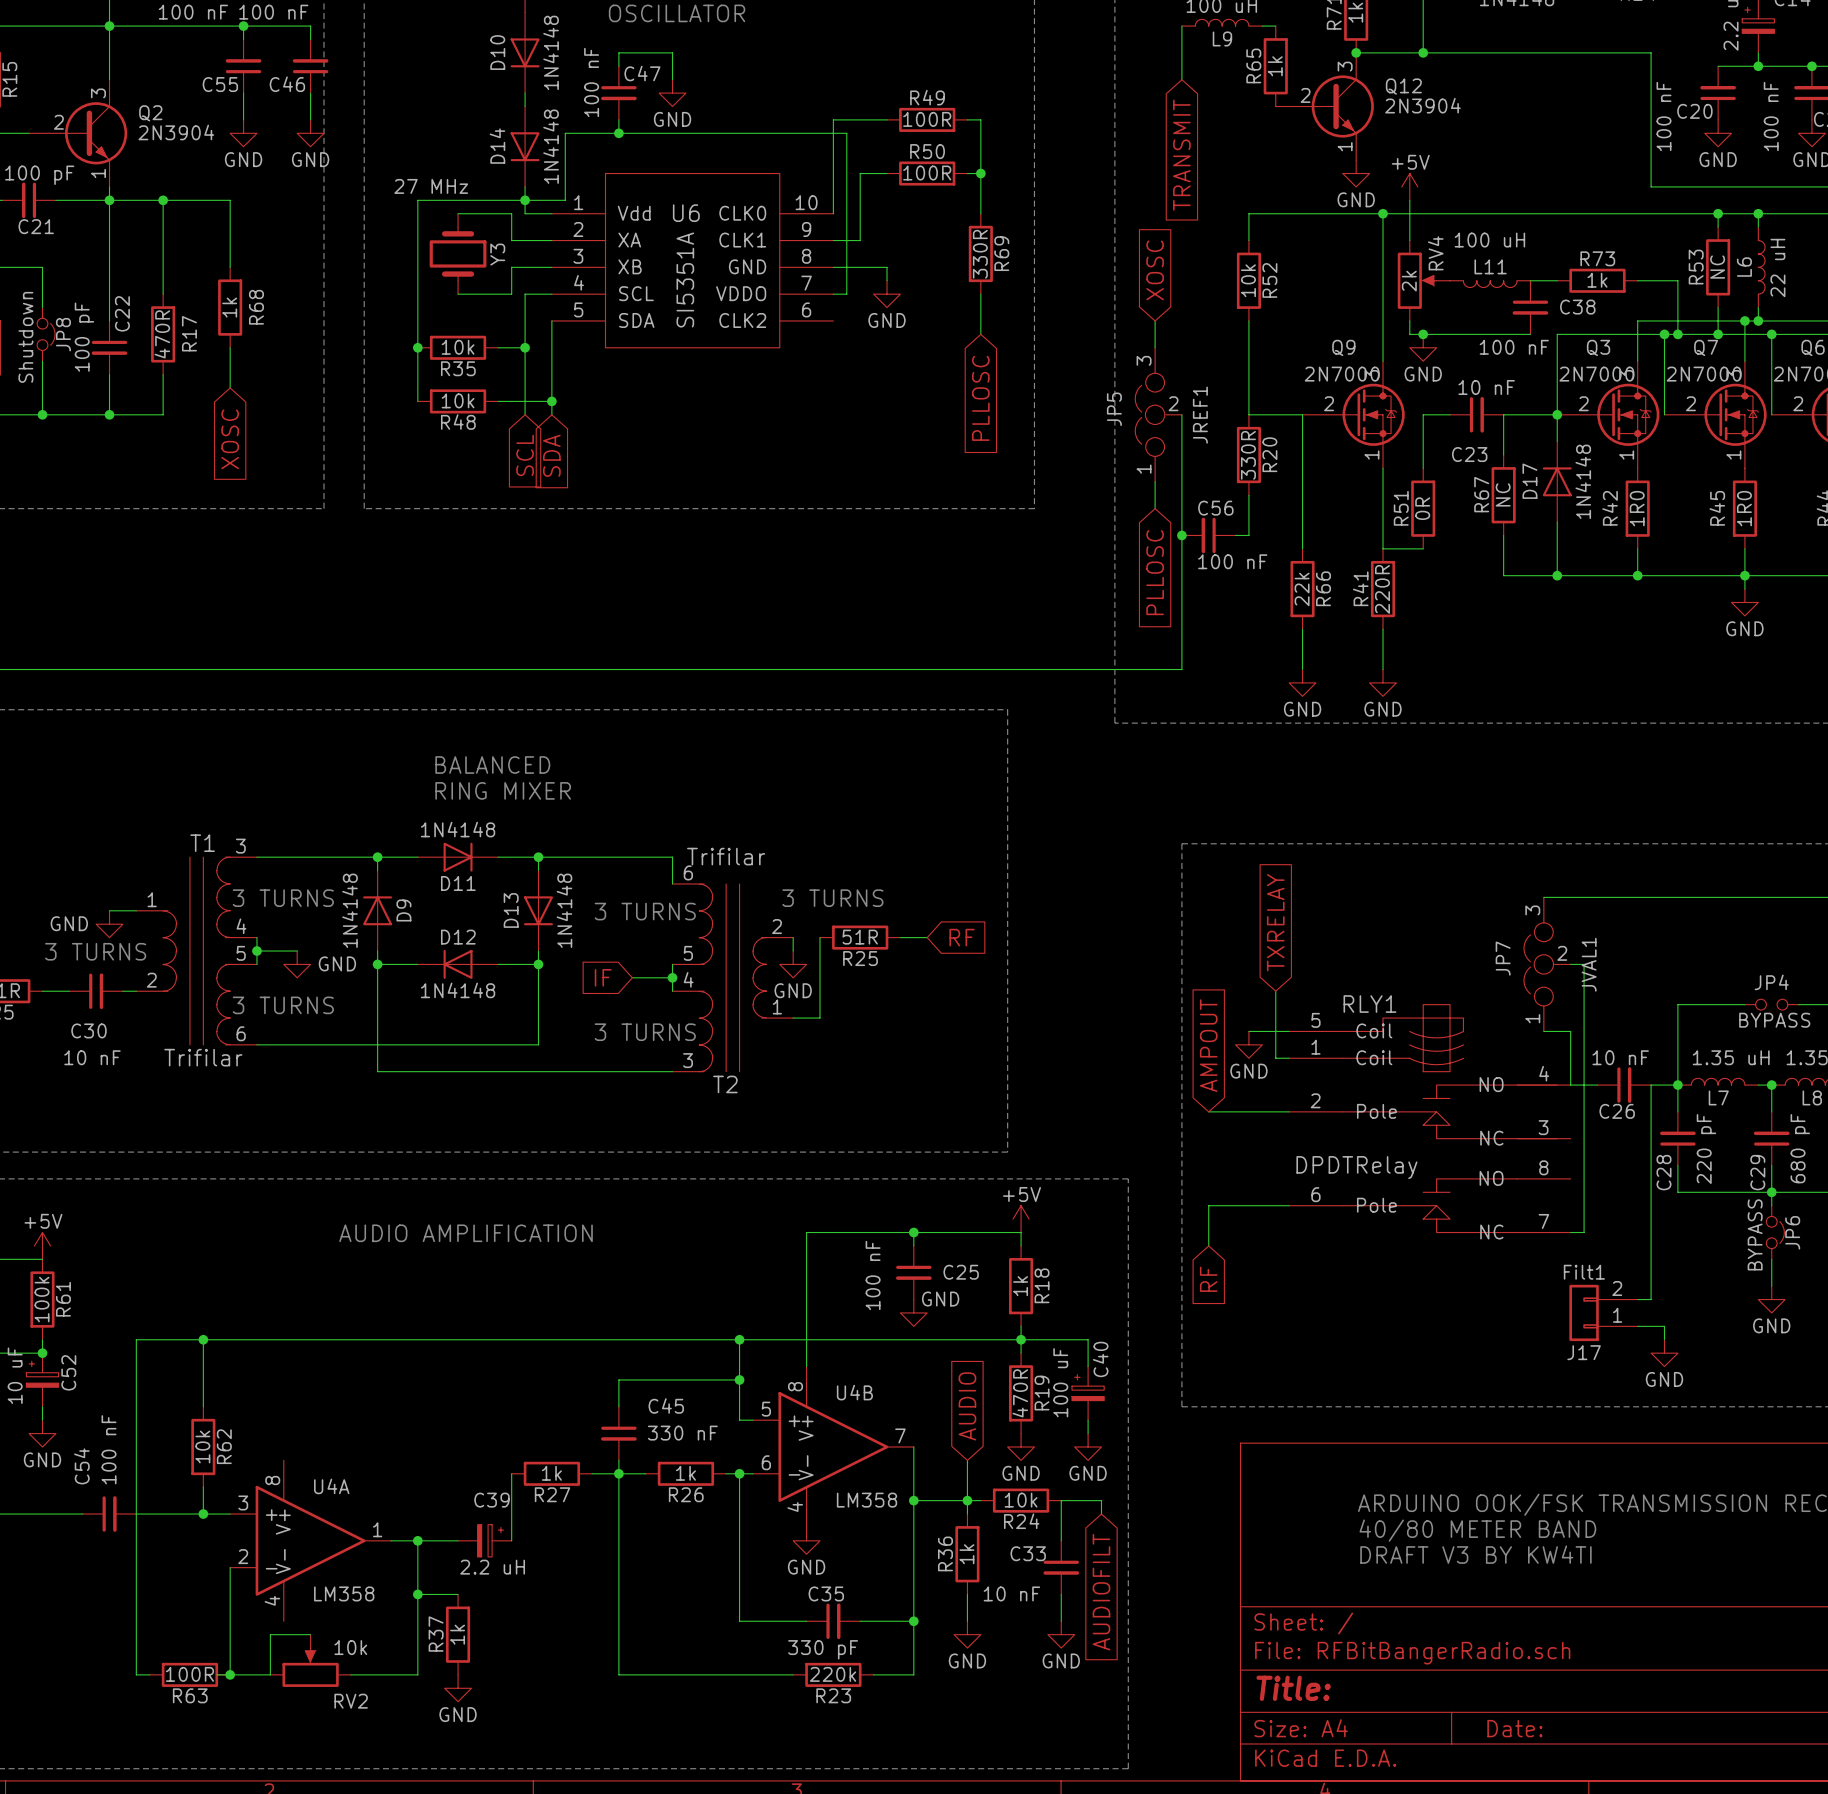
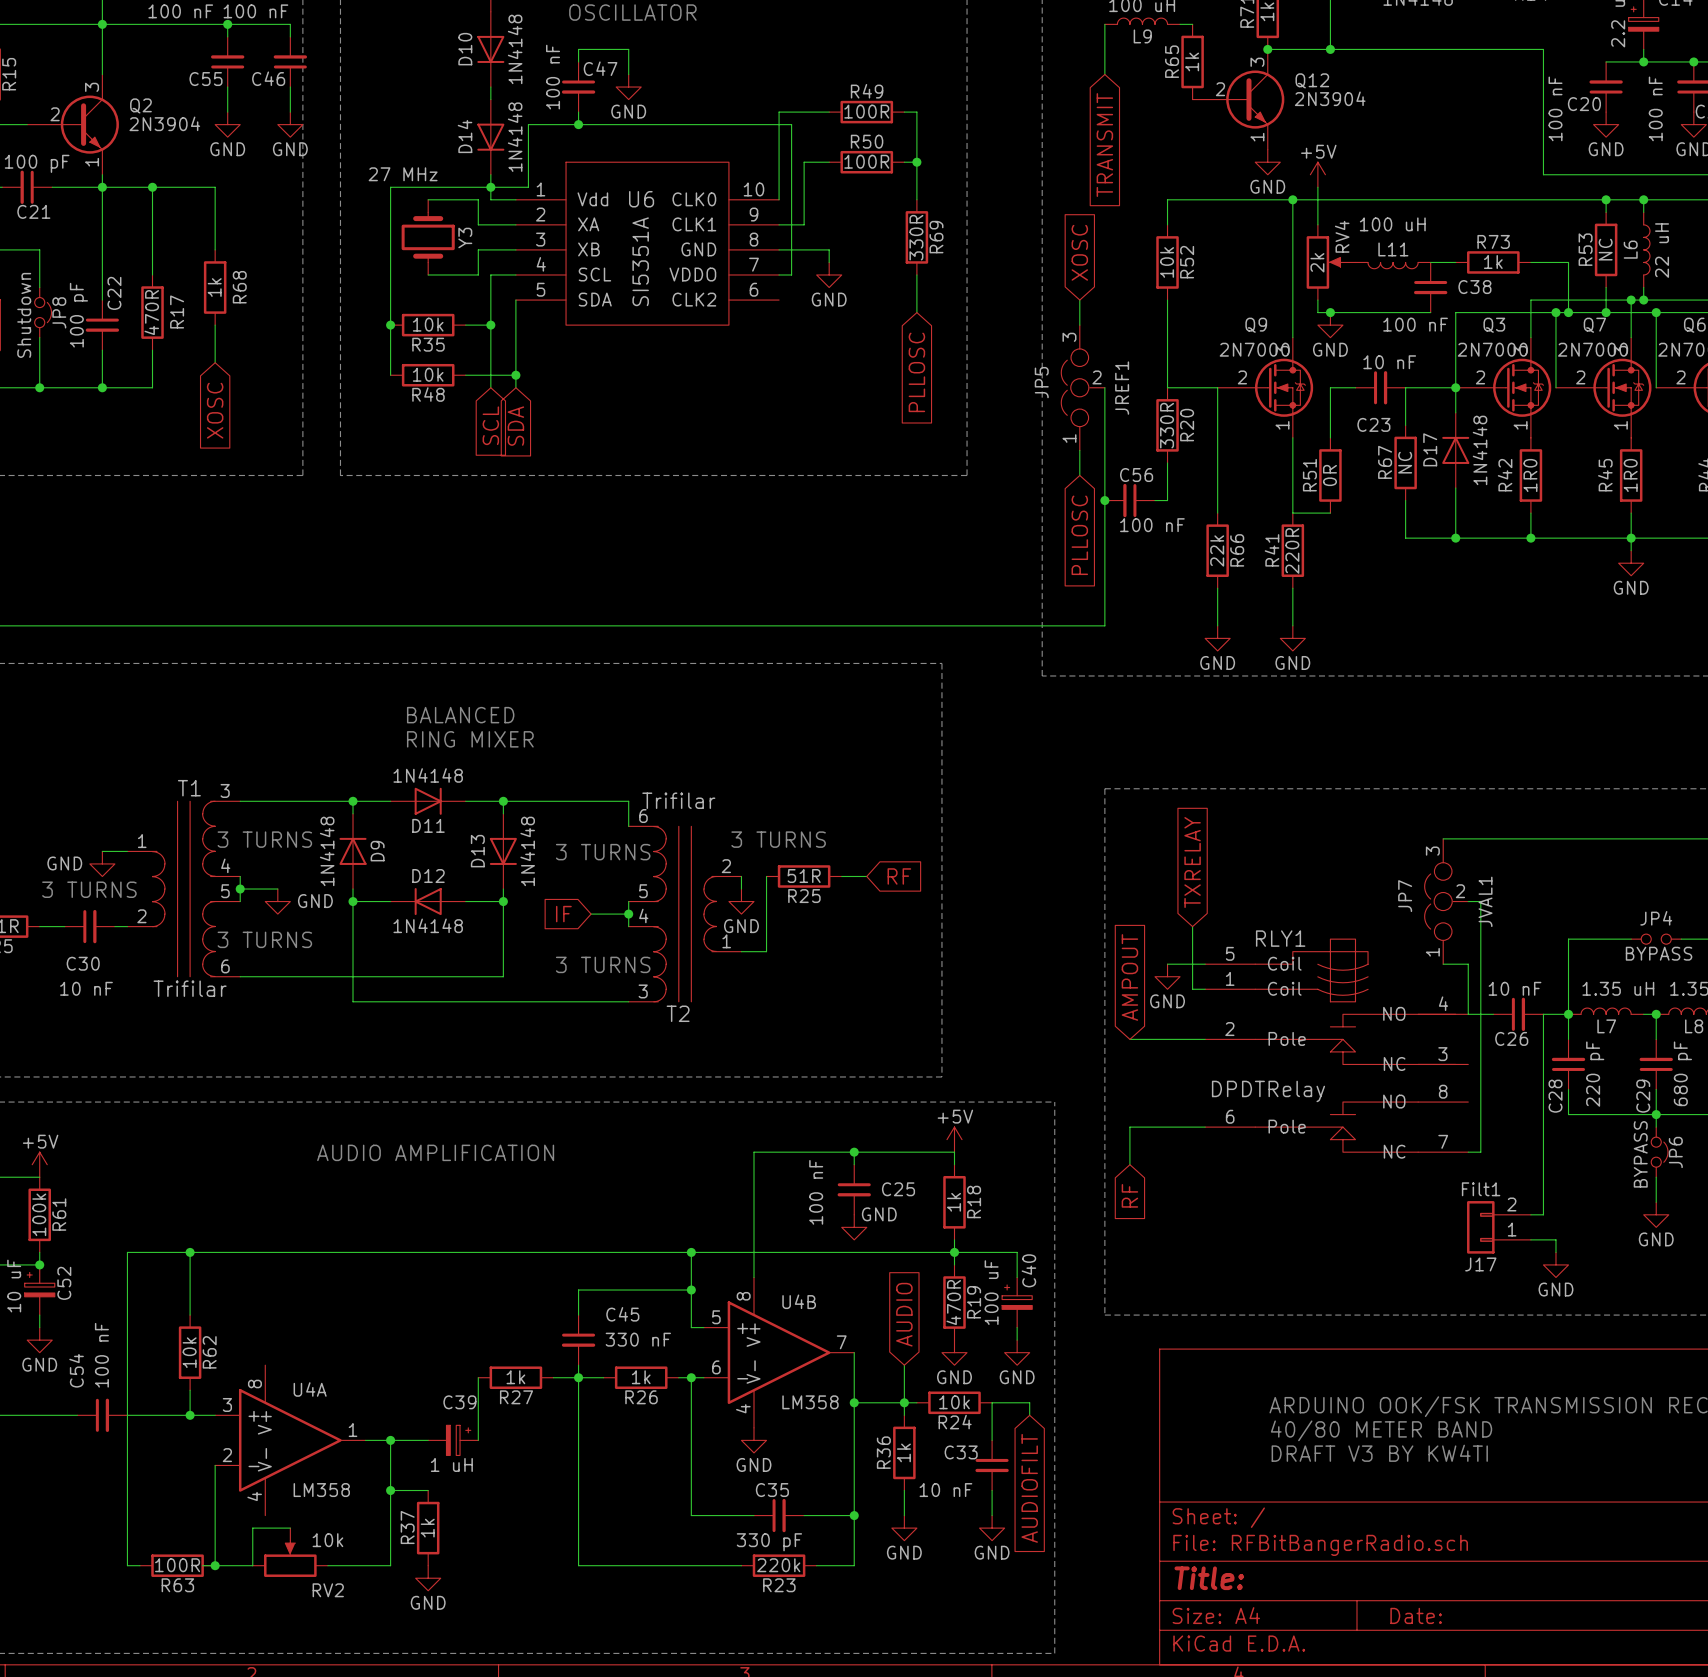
C39 value: 2.2 uH (492, 1567) -> 1 uH (451, 1464)

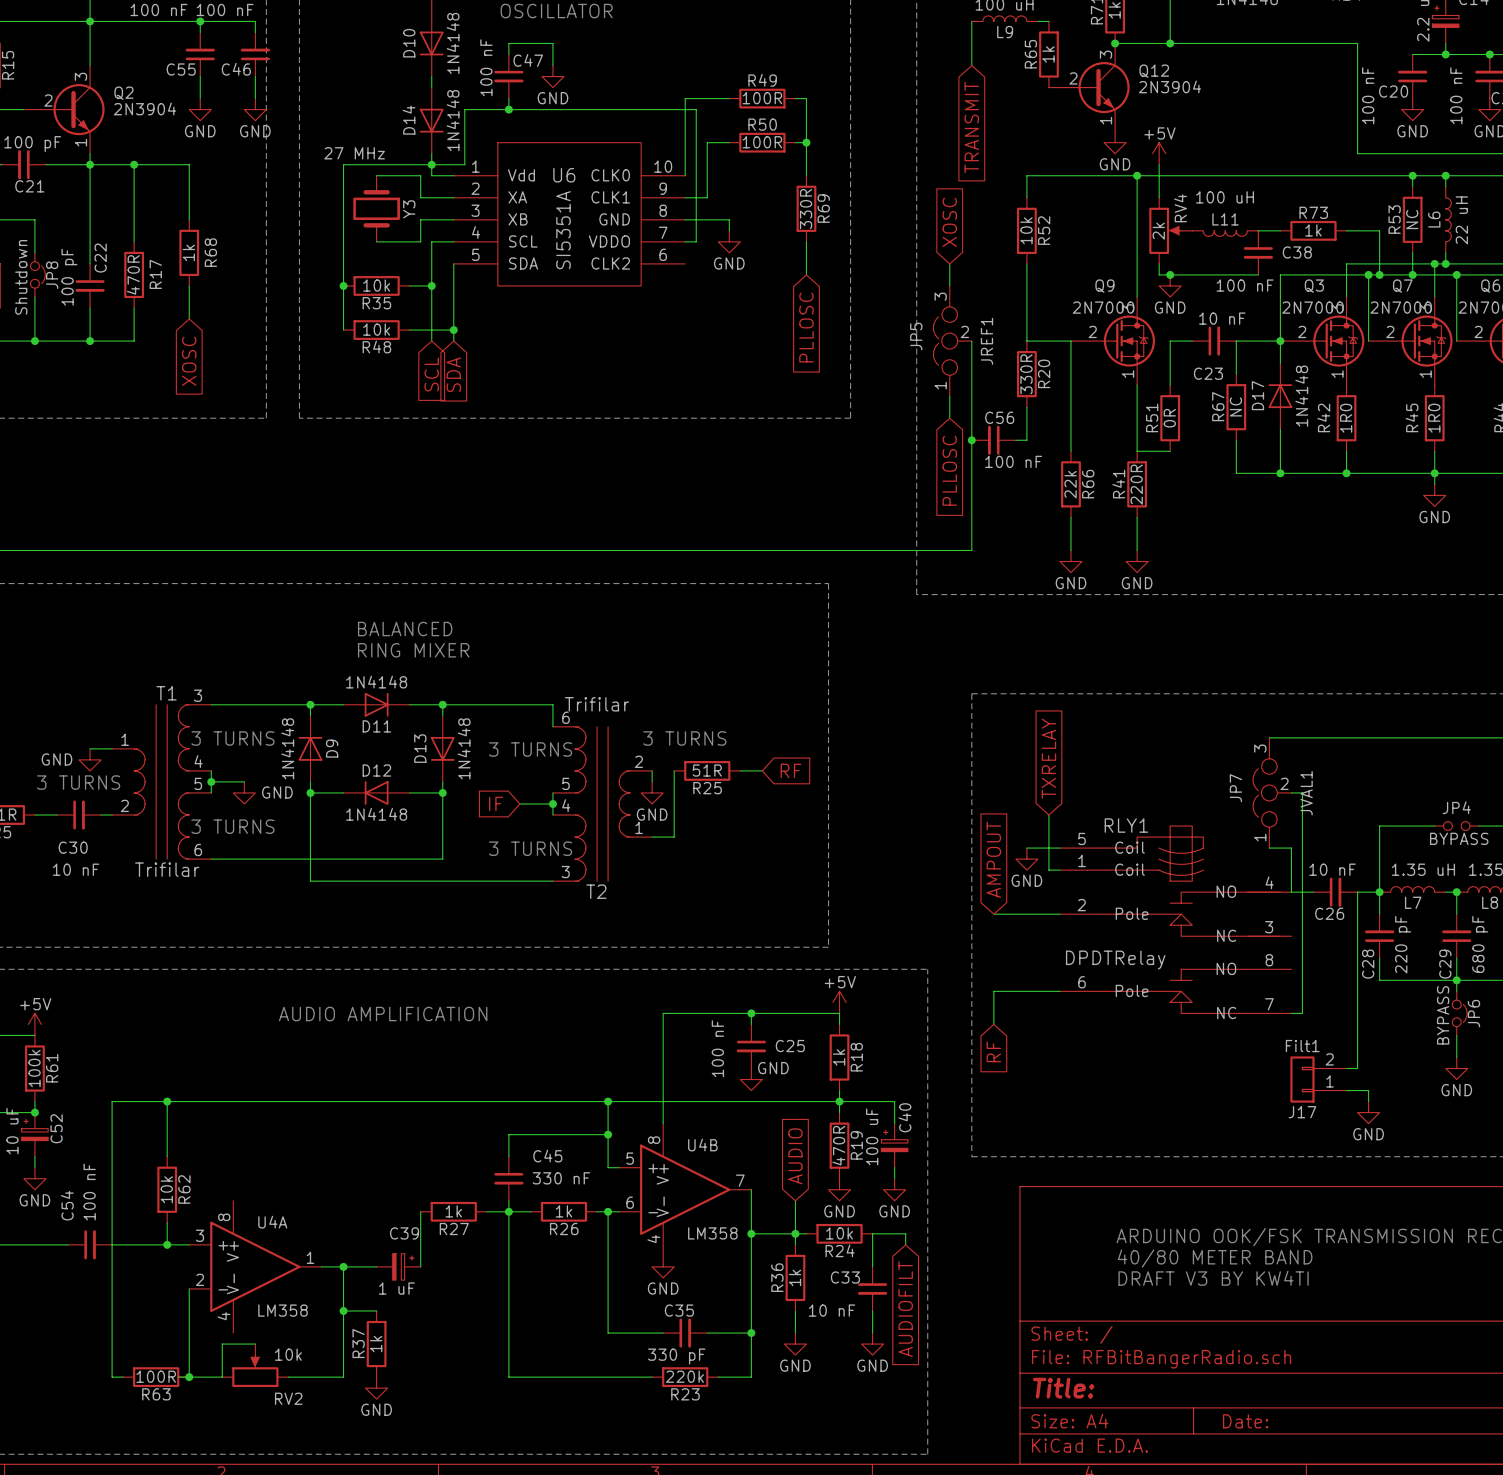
C39 value: 1 uH (451, 1464) -> 1 uF (396, 1288)

